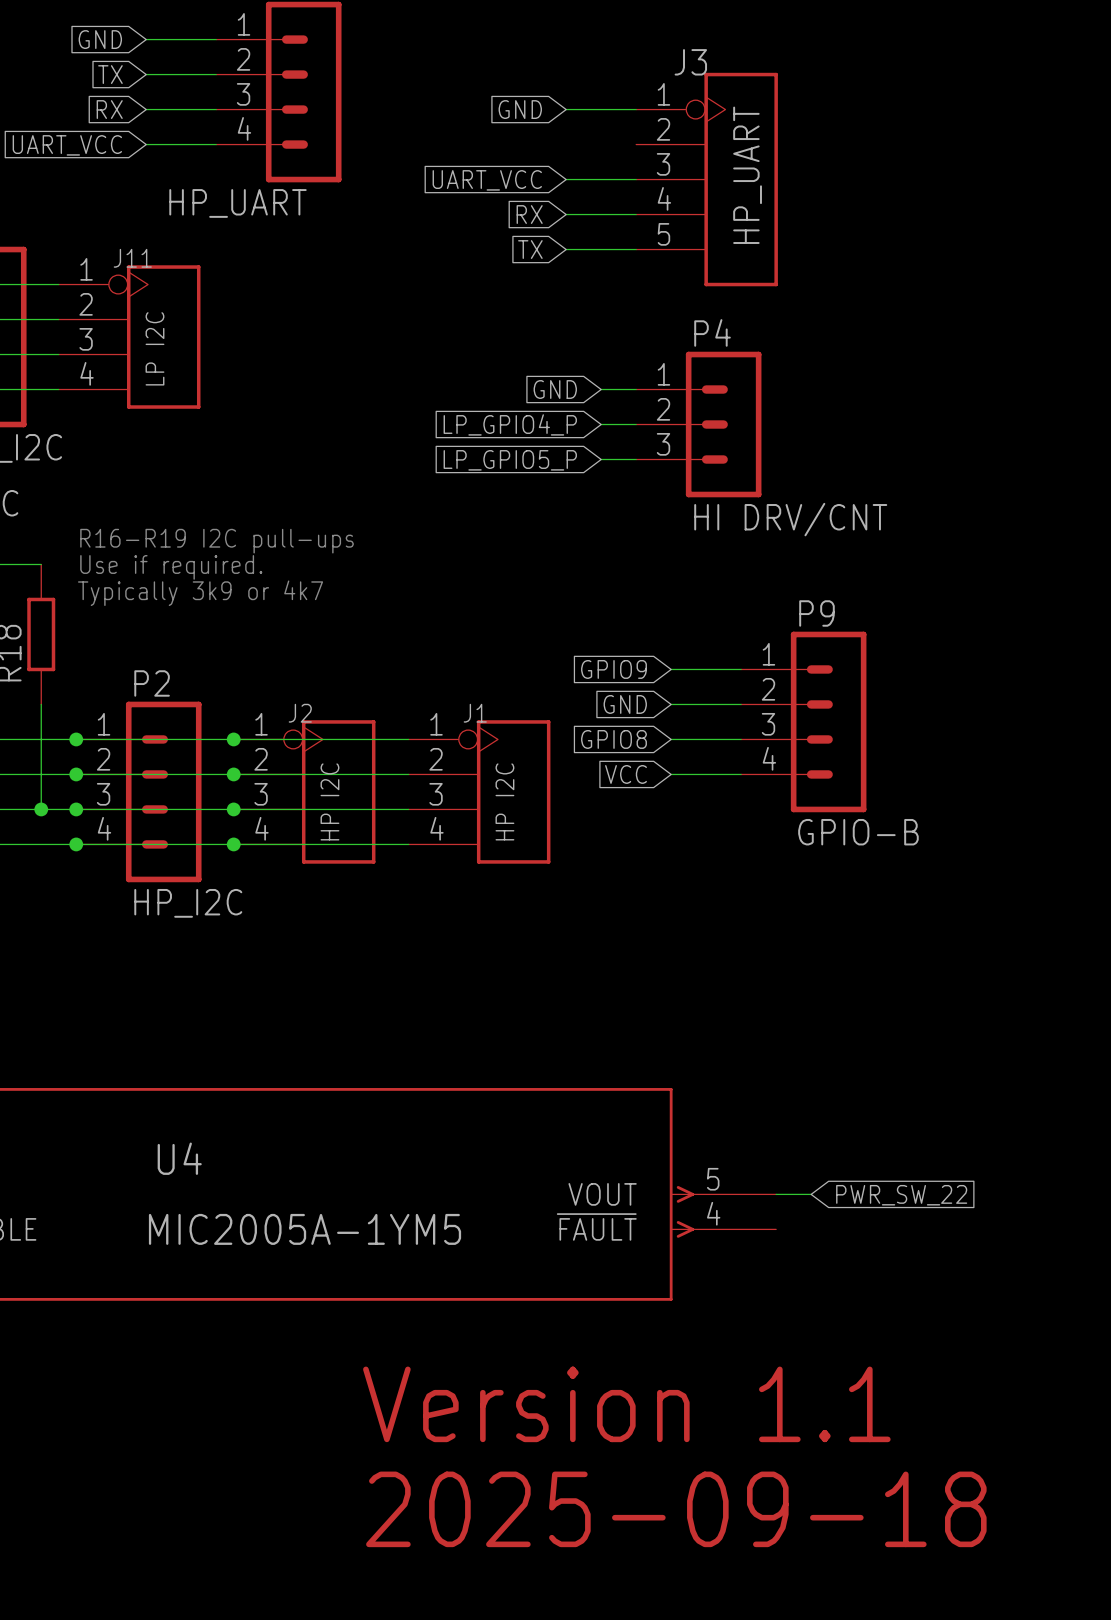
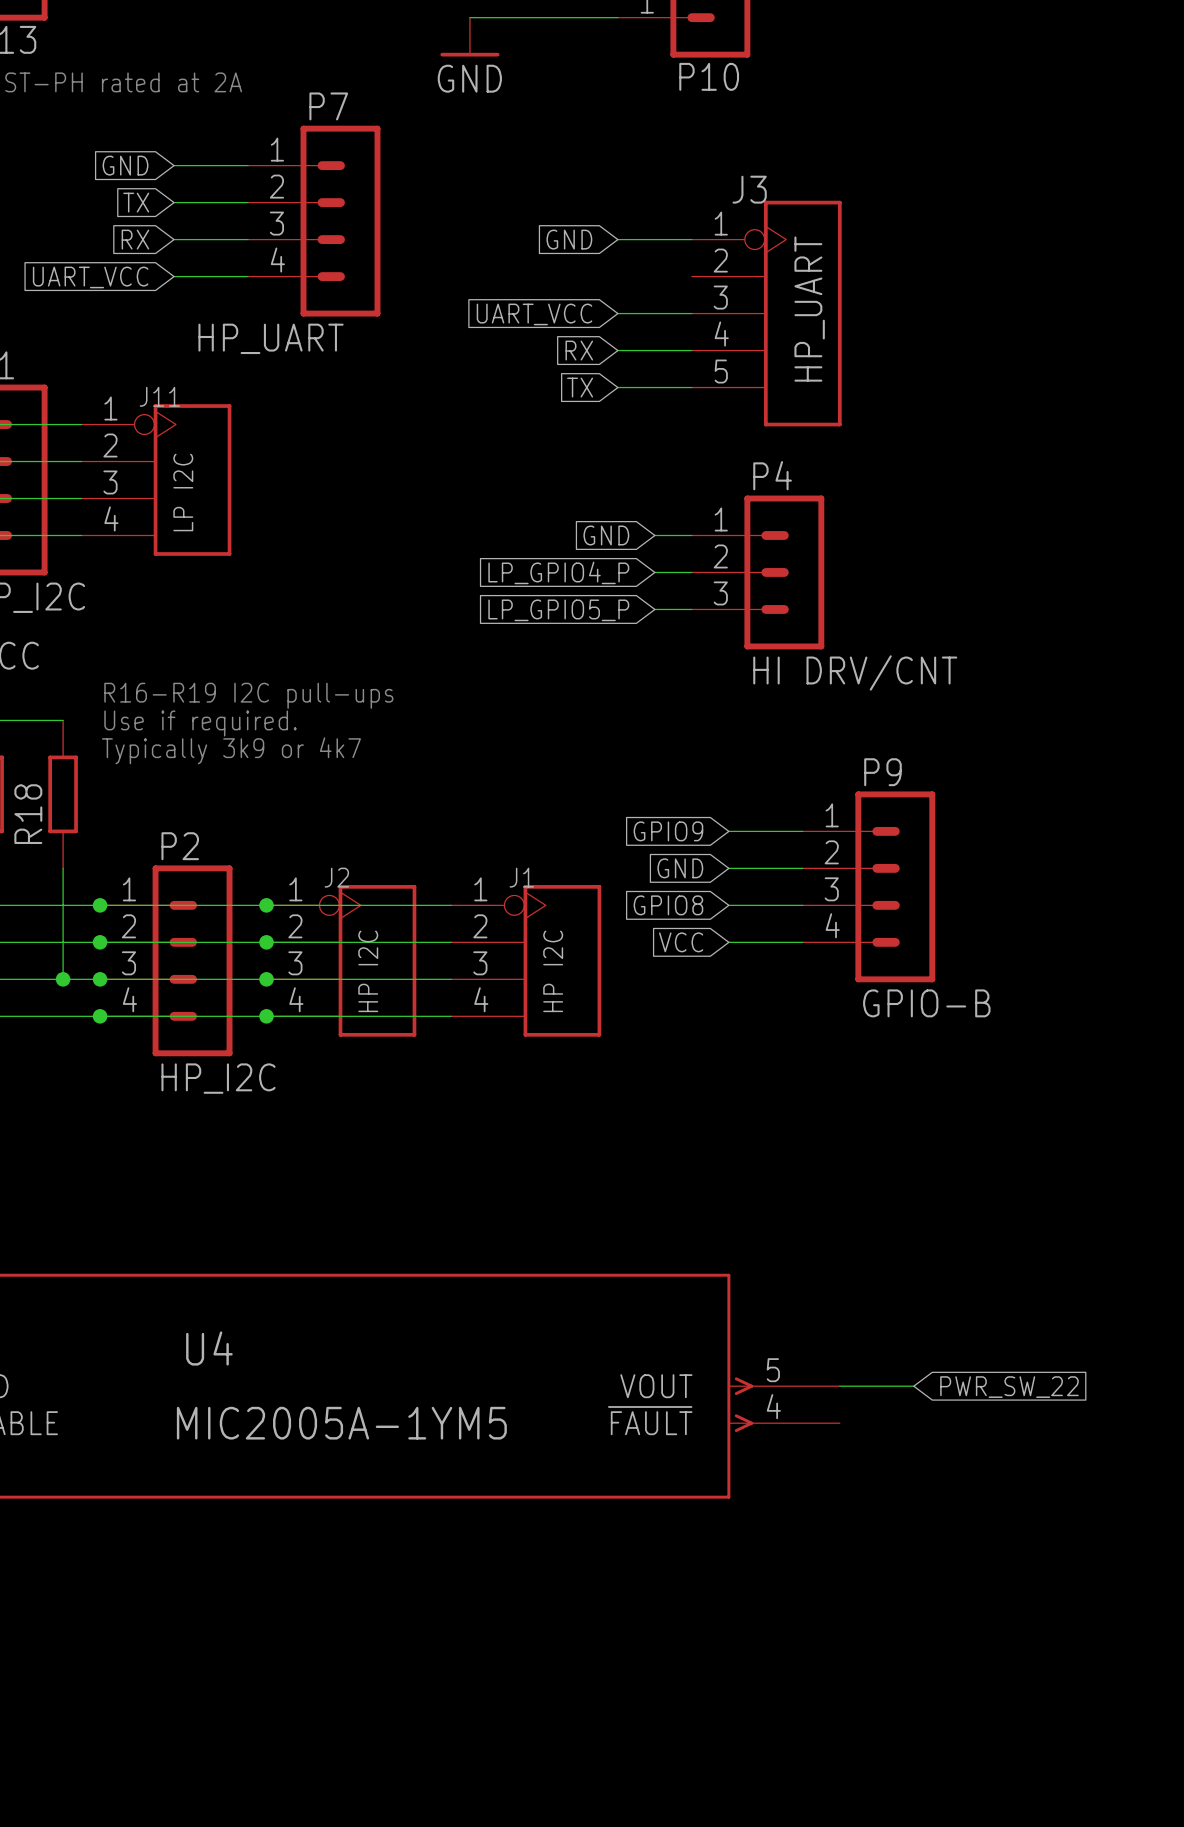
wire: none -> (876, 1386) (913, 1386)
global label position: PWR_SW_22 (901, 1195) -> PWR_SW_22 (1009, 1387)
text: Version 1.1 (626, 1404) -> none
text: 2025-09-18 (676, 1509) -> none

